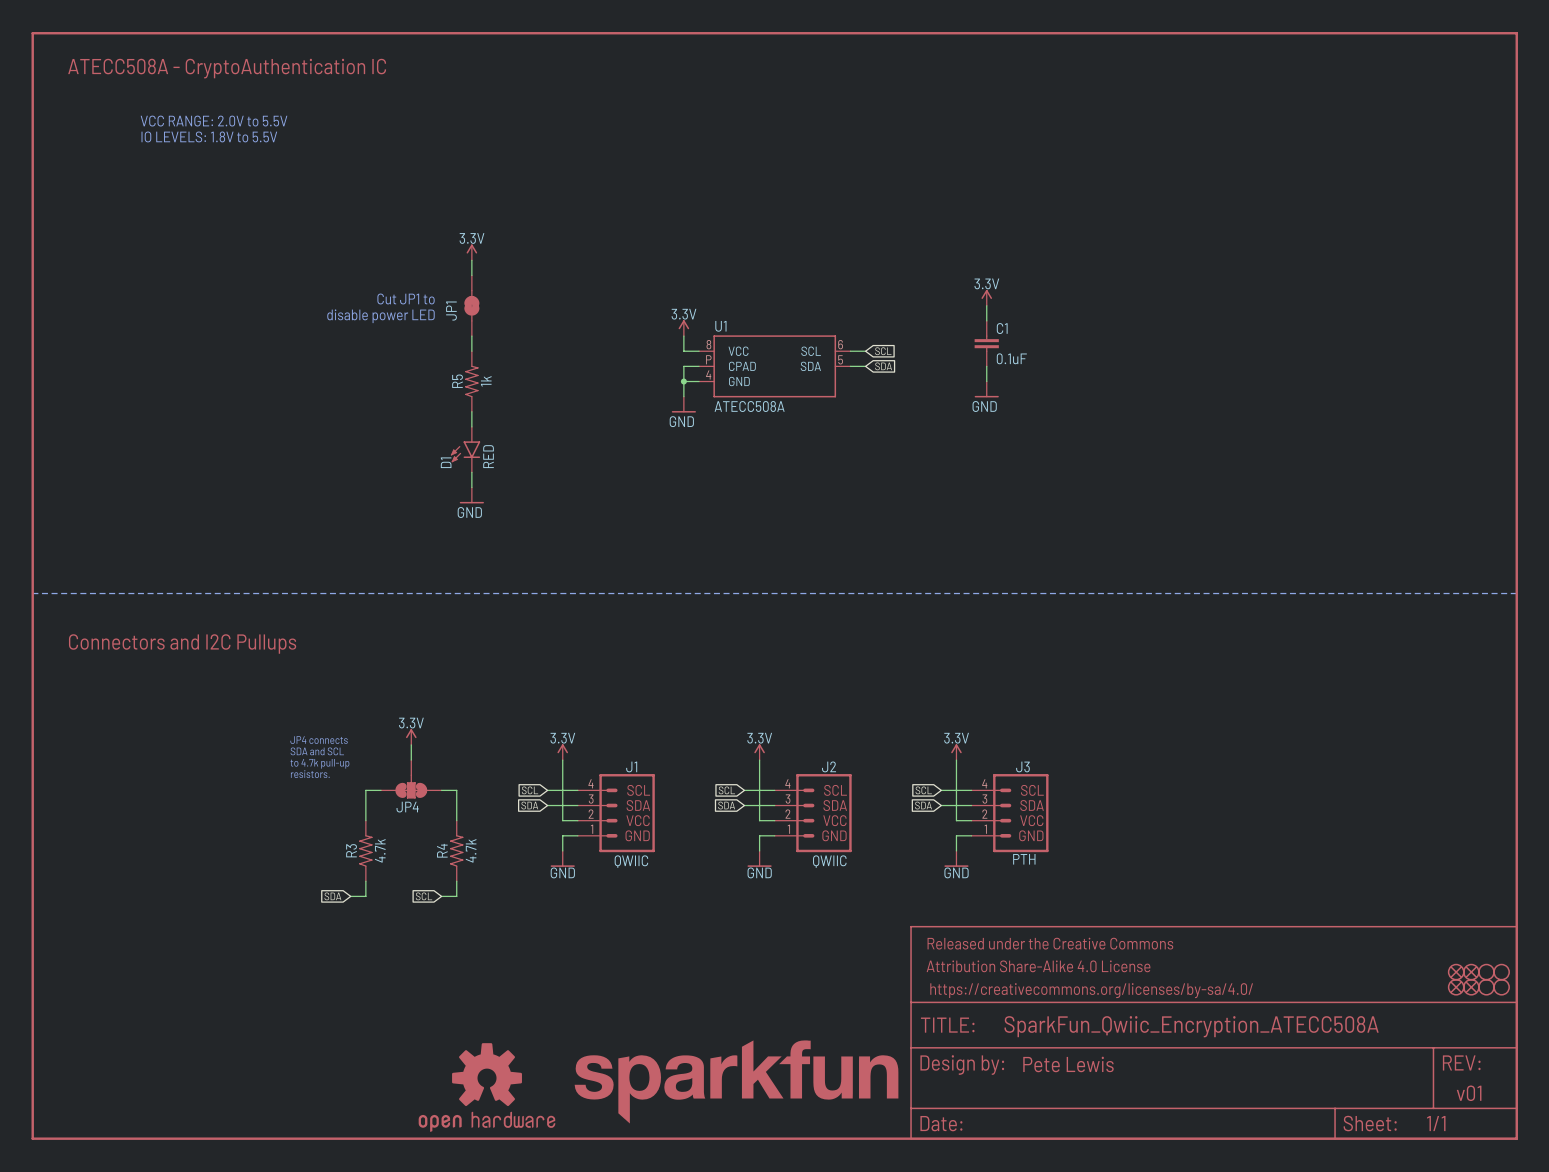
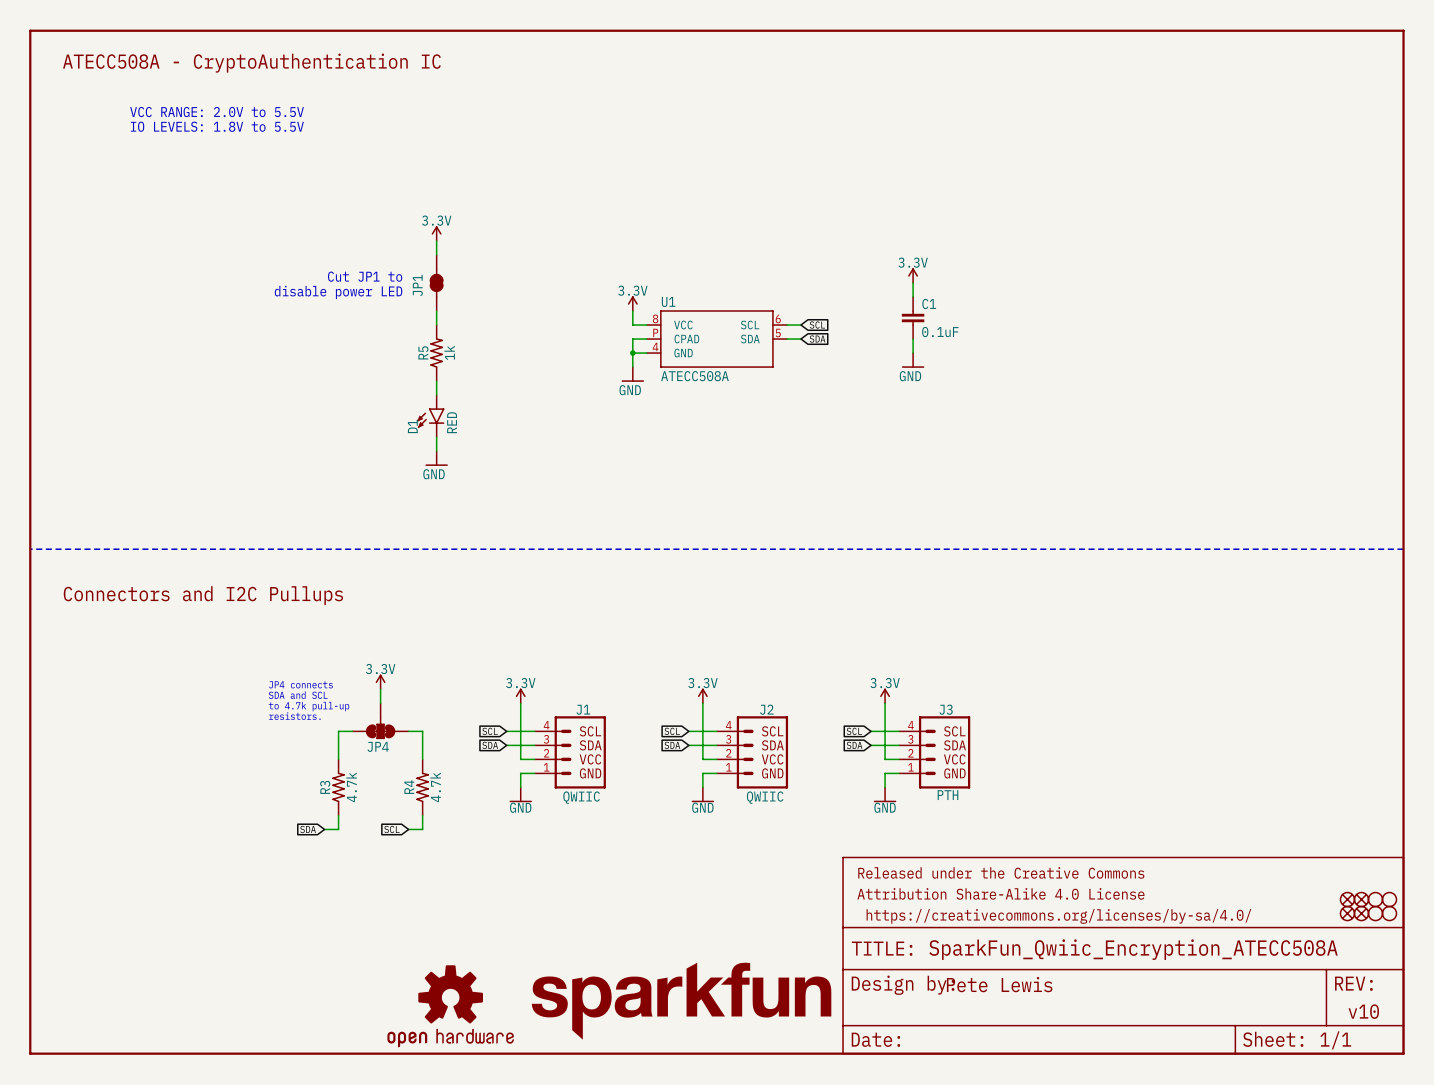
text: v01 (1469, 1093) -> v10 (1363, 1011)

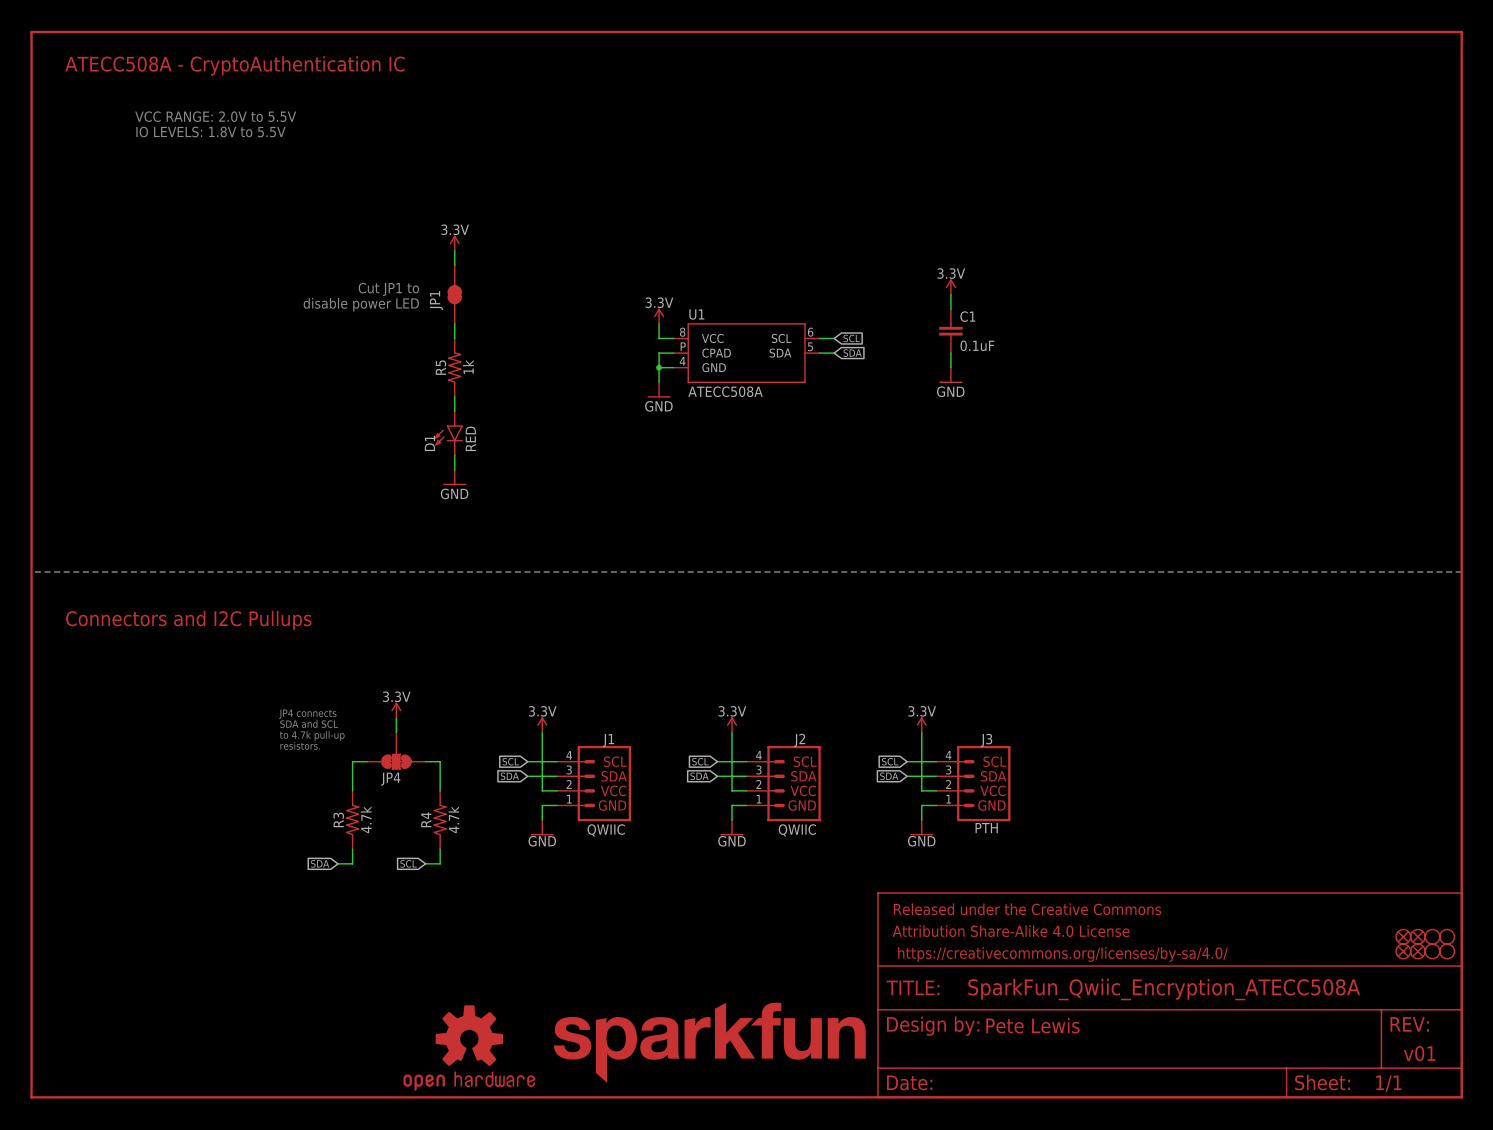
text: v10 (1363, 1011) -> v01 (1419, 1053)

